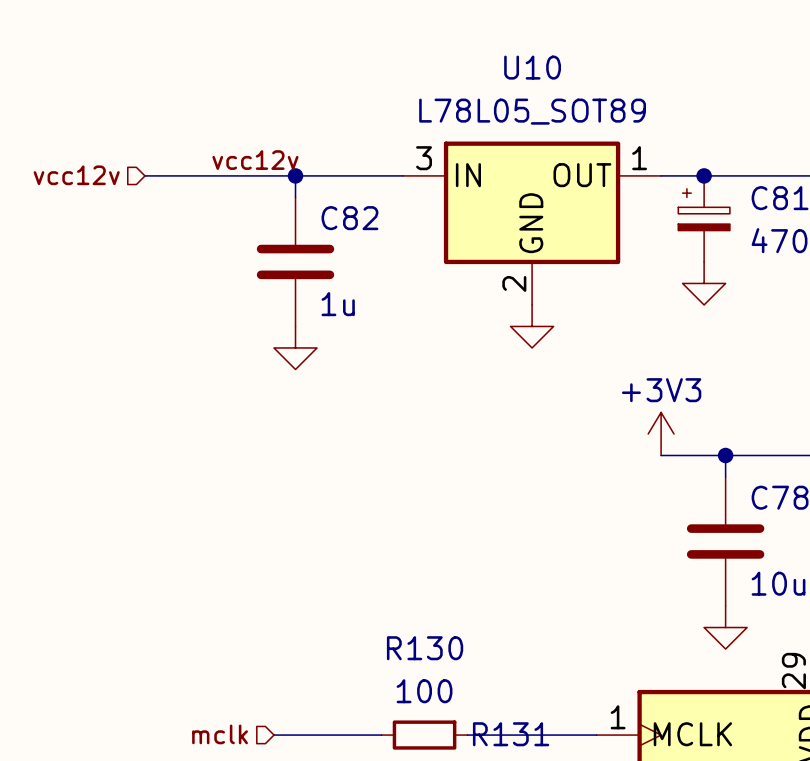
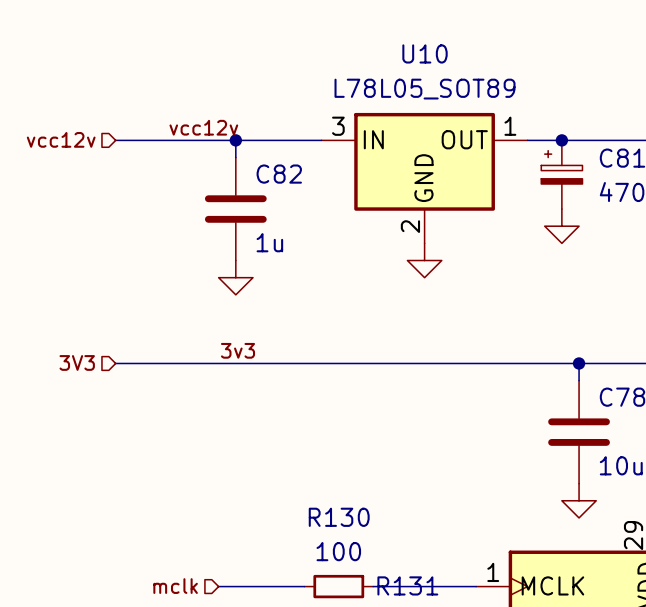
power symbol: +3V3 (661, 433) -> none
label: none -> 3v3 (238, 350)
hierarchical label: none -> 3V3 (77, 362)
wire: none -> (115, 363) (527, 363)

